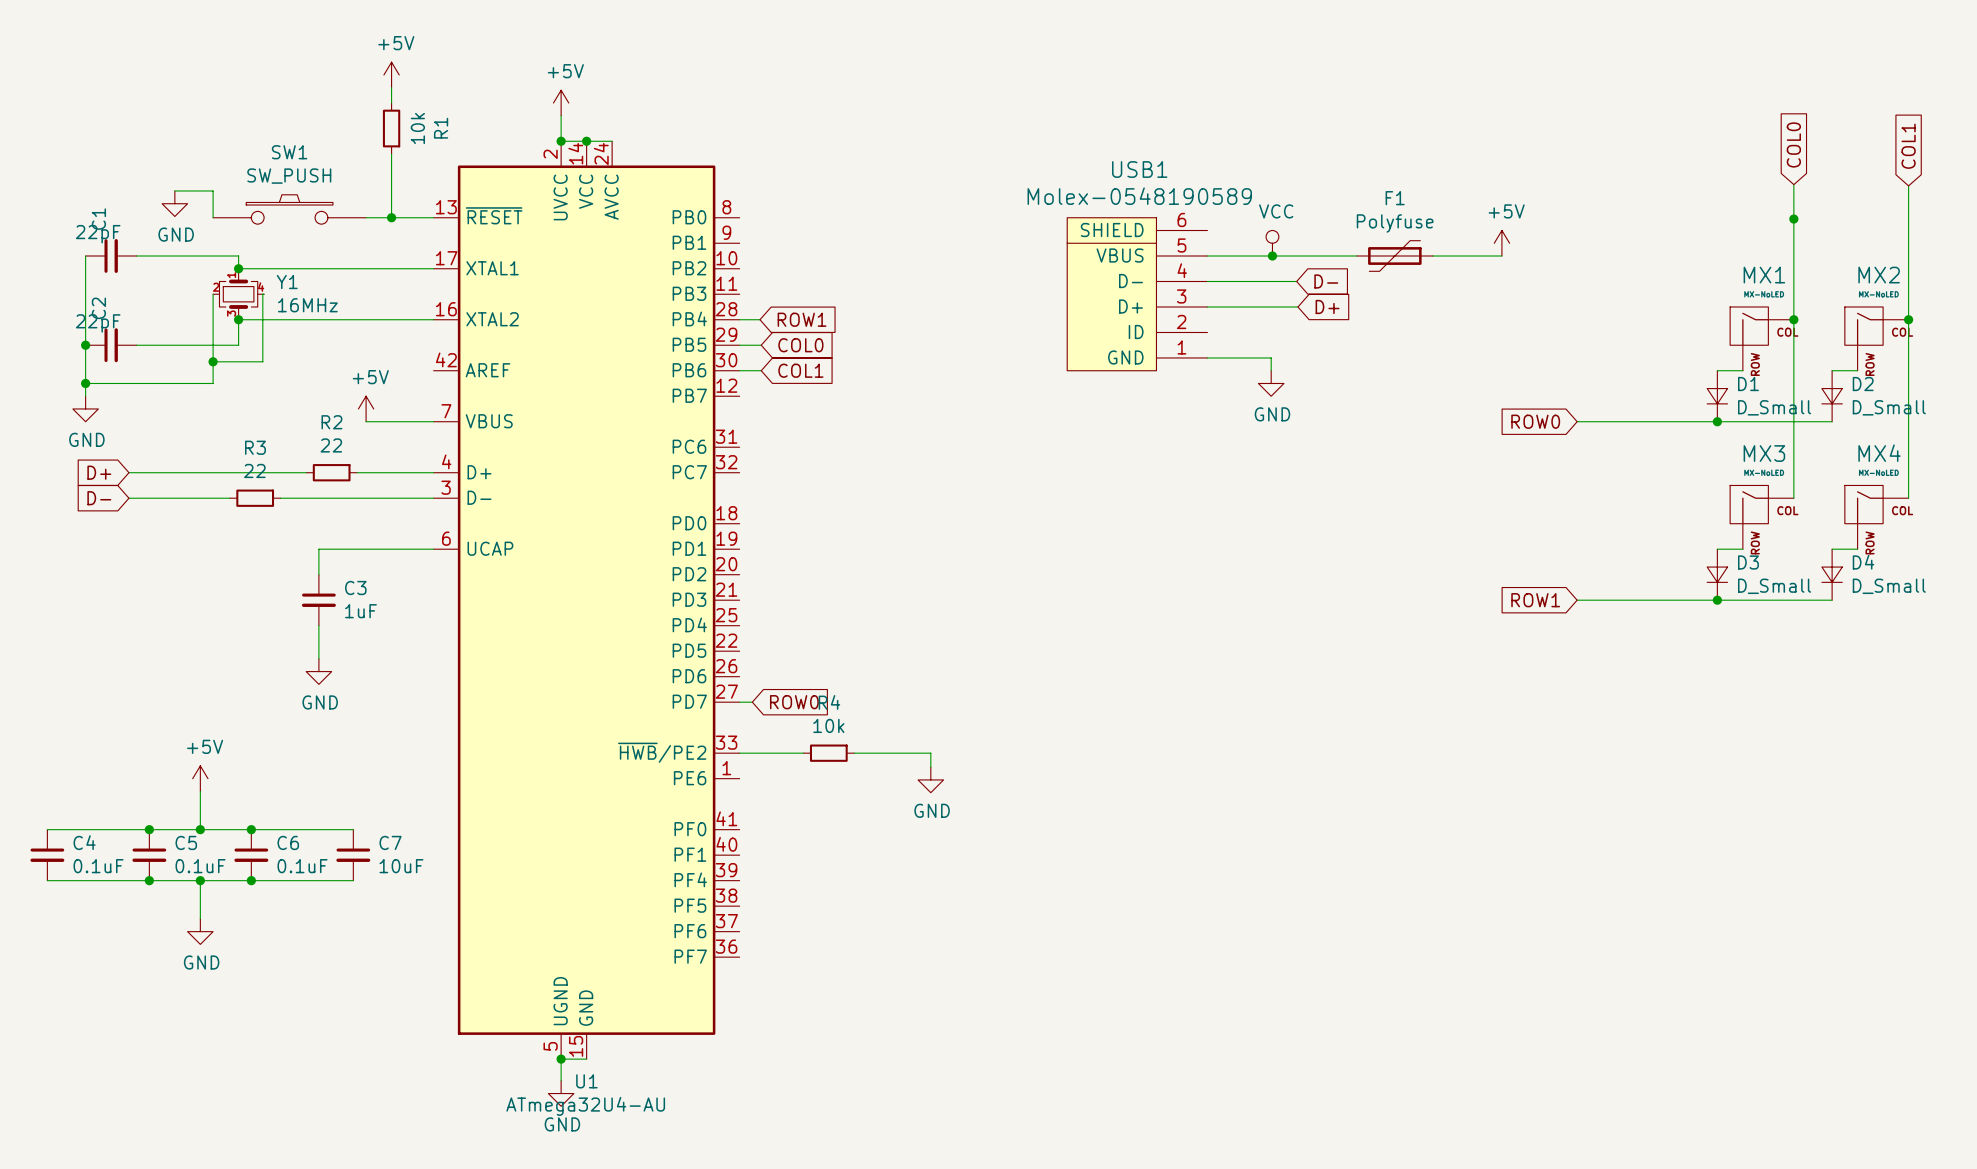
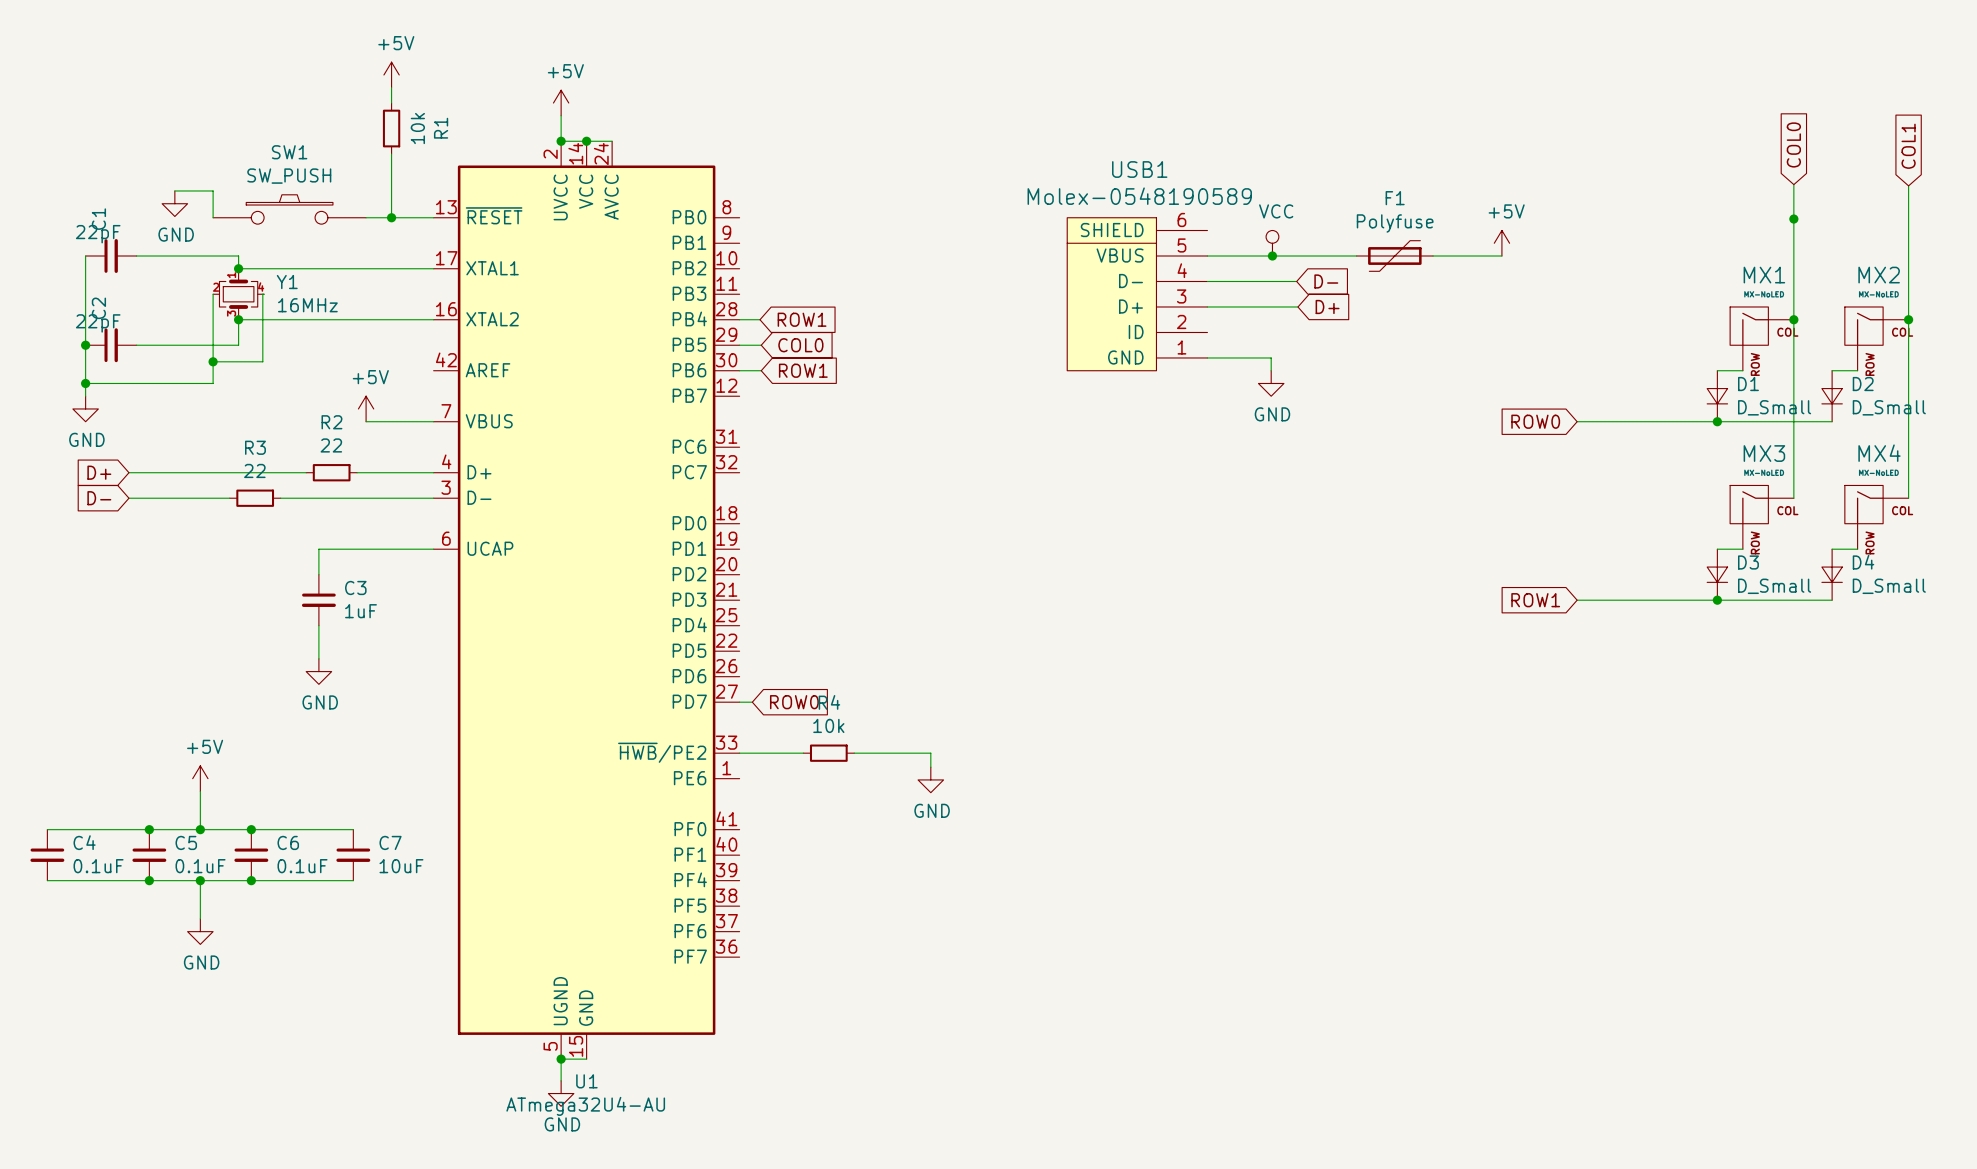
global label: COL1 (800, 370) -> ROW1 (803, 370)

